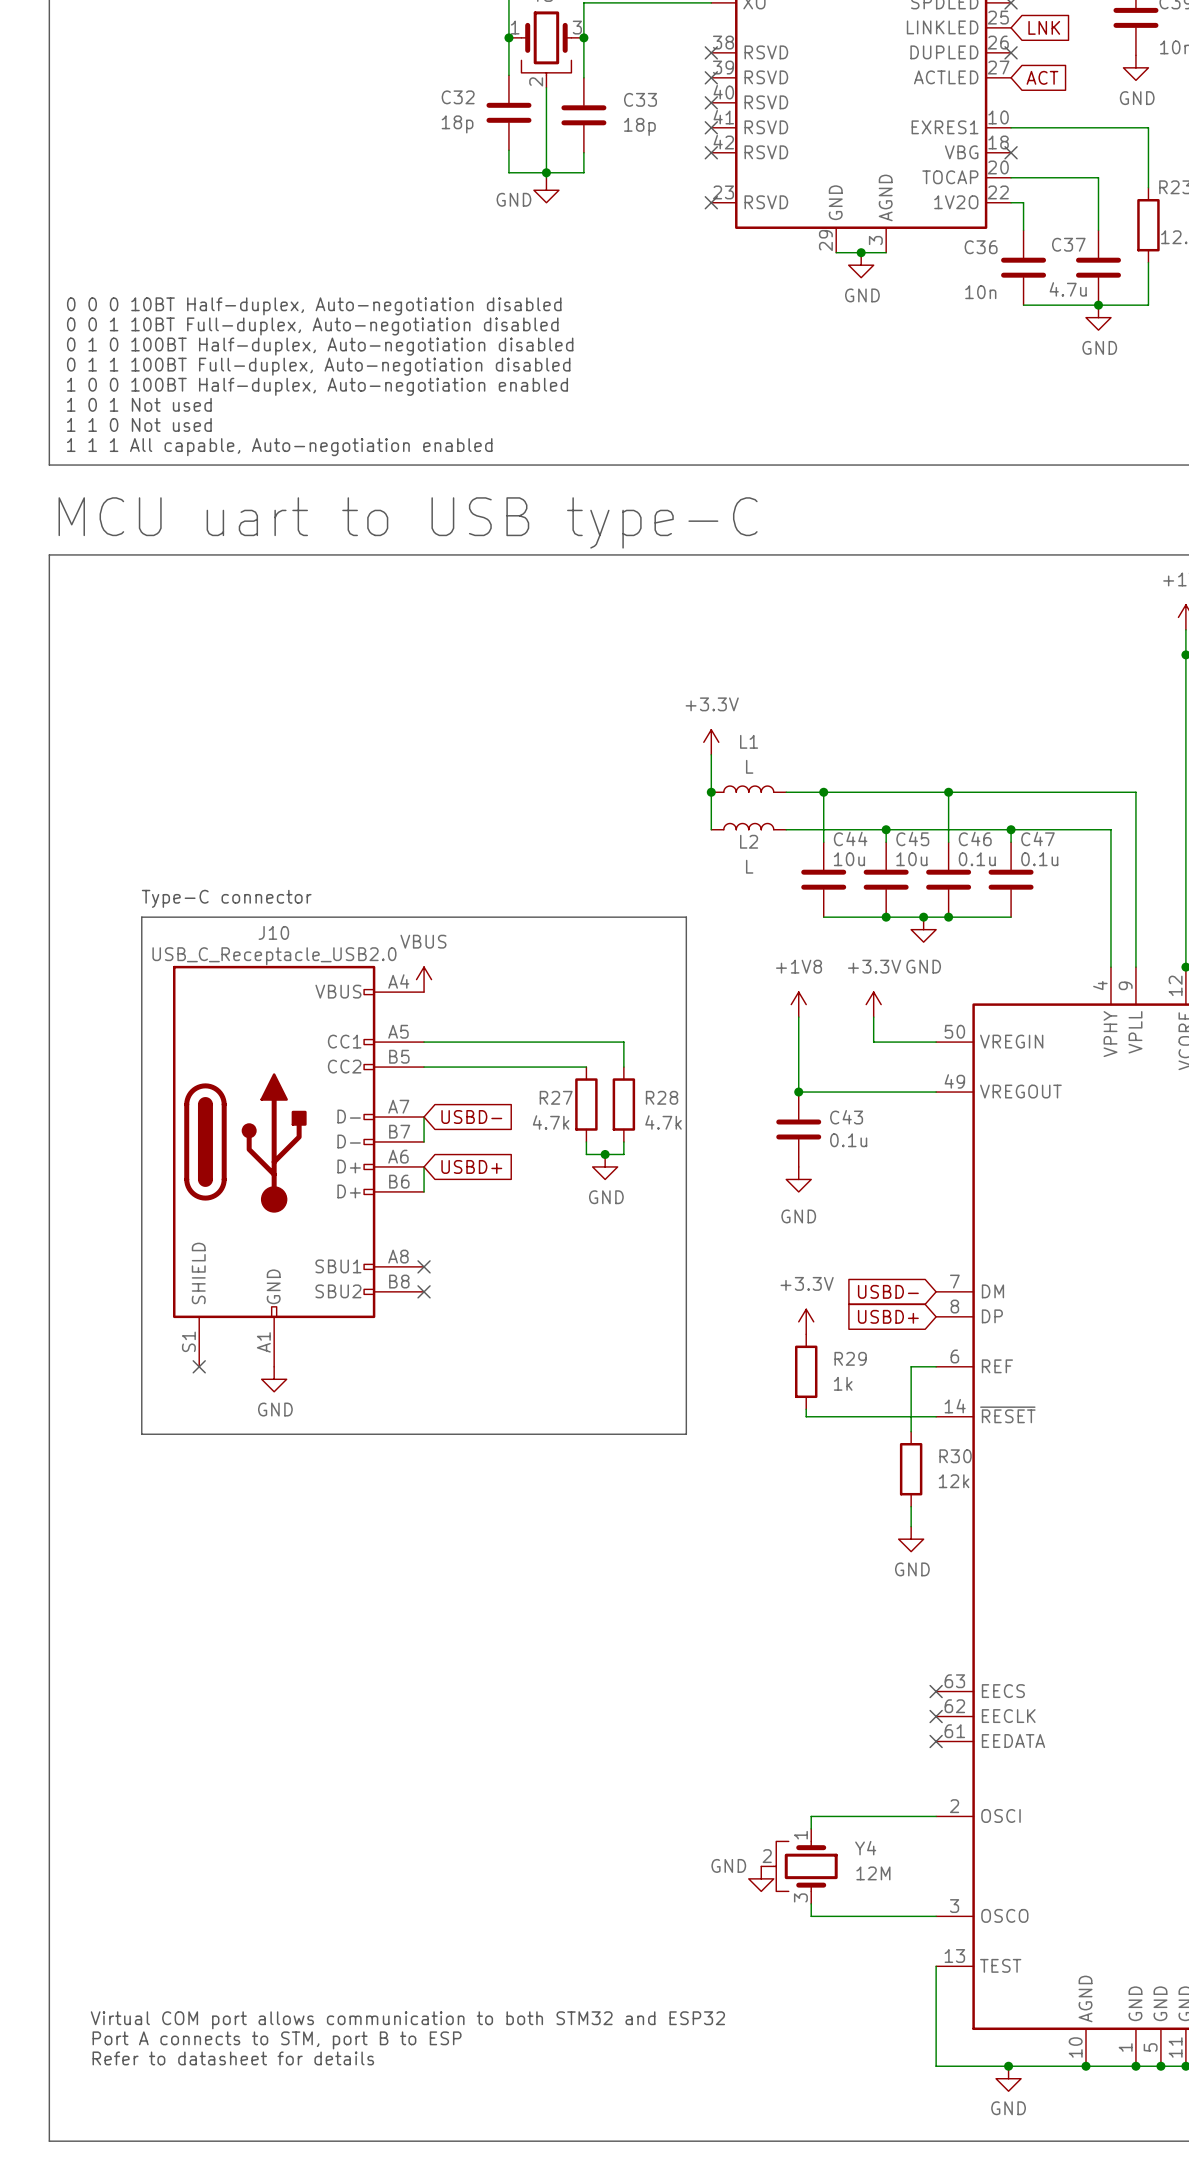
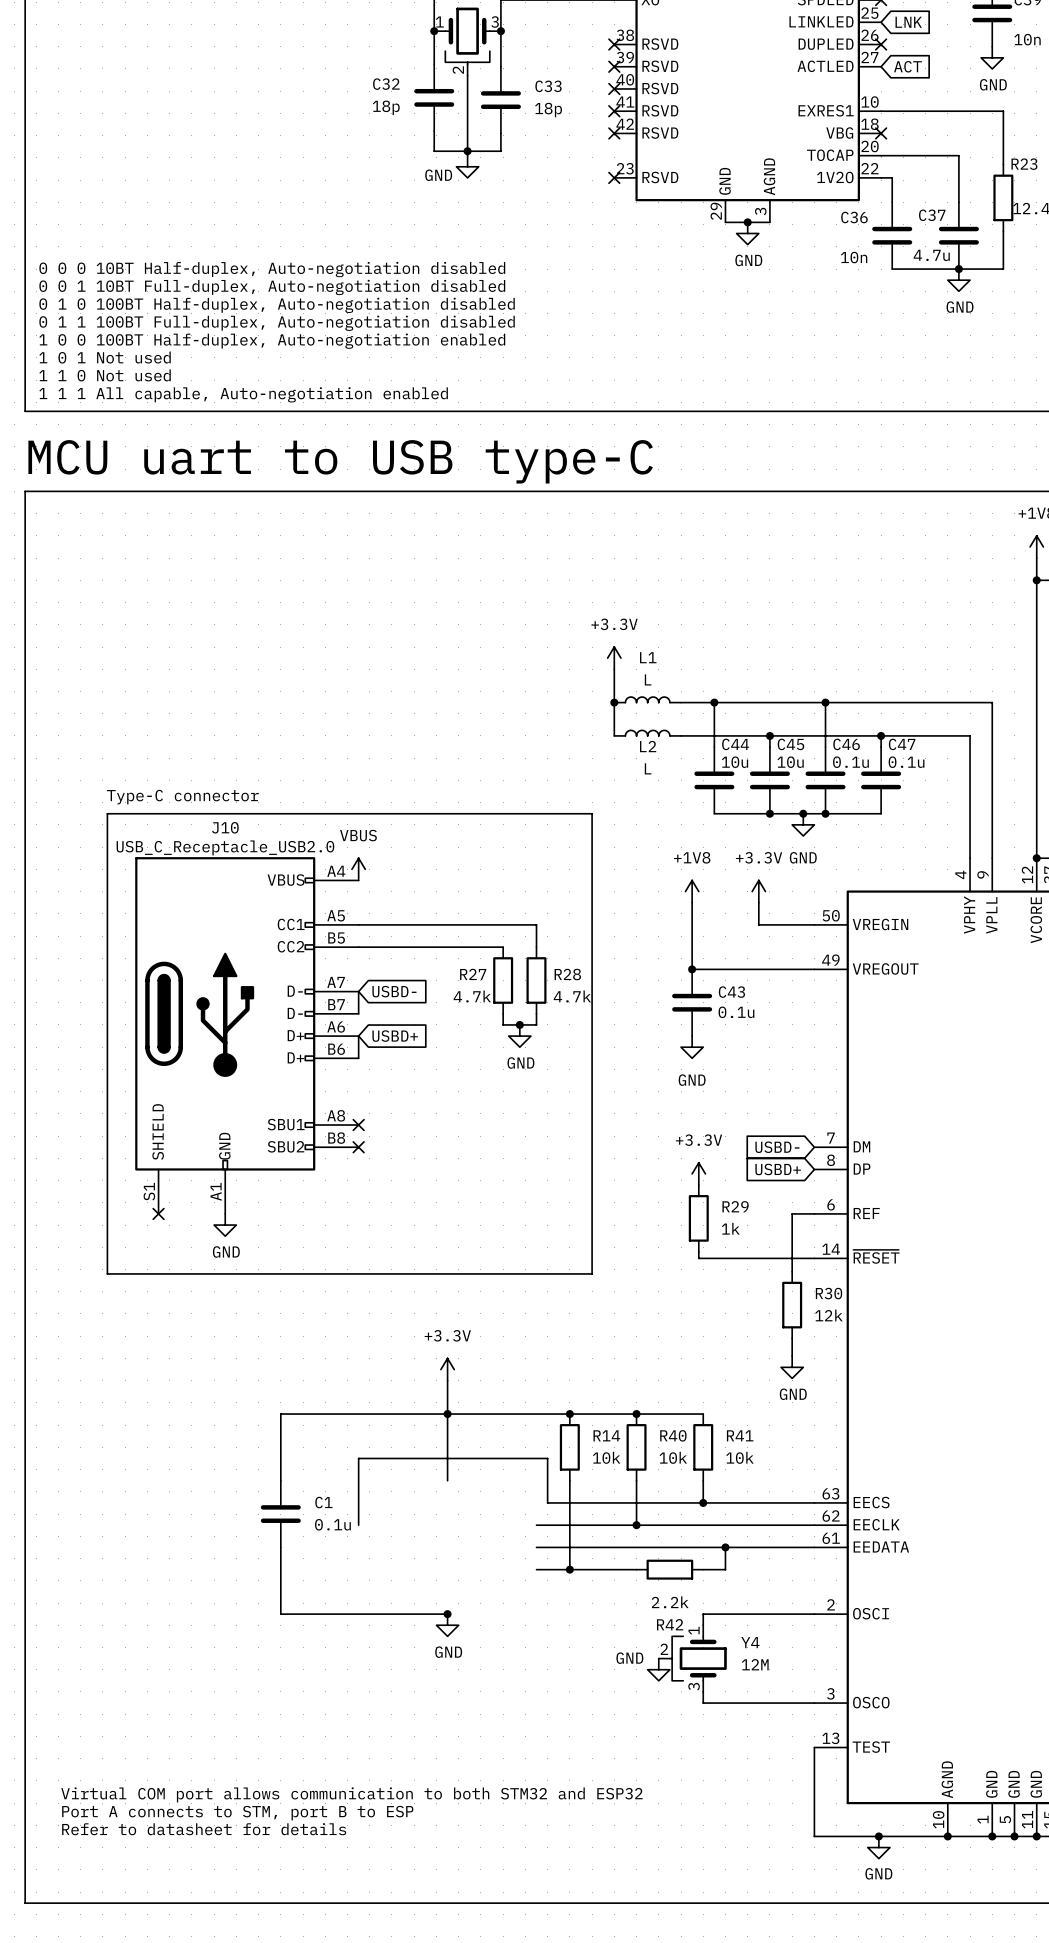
power symbol: none -> +3.3V (447, 1369)
wire: none -> (447, 1380) (447, 1480)
junction: none -> (447, 1414)
junction: none -> (569, 1414)
junction: none -> (636, 1414)
wire: none -> (703, 1414) (280, 1414) (280, 1480)
R14: none -> 10k (569, 1447)
R40: none -> 10k (636, 1447)
R41: none -> 10k (703, 1447)
wire: none -> (569, 1480) (569, 1569)
wire: none -> (636, 1480) (636, 1525)
wire: none -> (703, 1480) (703, 1502)
junction: none -> (703, 1502)
wire: none -> (814, 1502) (547, 1502) (547, 1458) (358, 1458) (358, 1525)
no-connect mark: (936, 1691) -> none
C1: none -> 0.1u (280, 1514)
wire: none -> (536, 1525) (814, 1525)
junction: none -> (636, 1525)
no-connect mark: (936, 1716) -> none
wire: none -> (280, 1547) (280, 1614) (447, 1614)
wire: none -> (536, 1547) (814, 1547)
wire: none -> (725, 1547) (725, 1569) (703, 1569)
junction: none -> (725, 1547)
no-connect mark: (936, 1741) -> none
wire: none -> (536, 1569) (636, 1569)
junction: none -> (569, 1569)
R42: none -> 2.2k (669, 1569)
junction: none -> (447, 1614)
power symbol: none -> GND (447, 1625)

